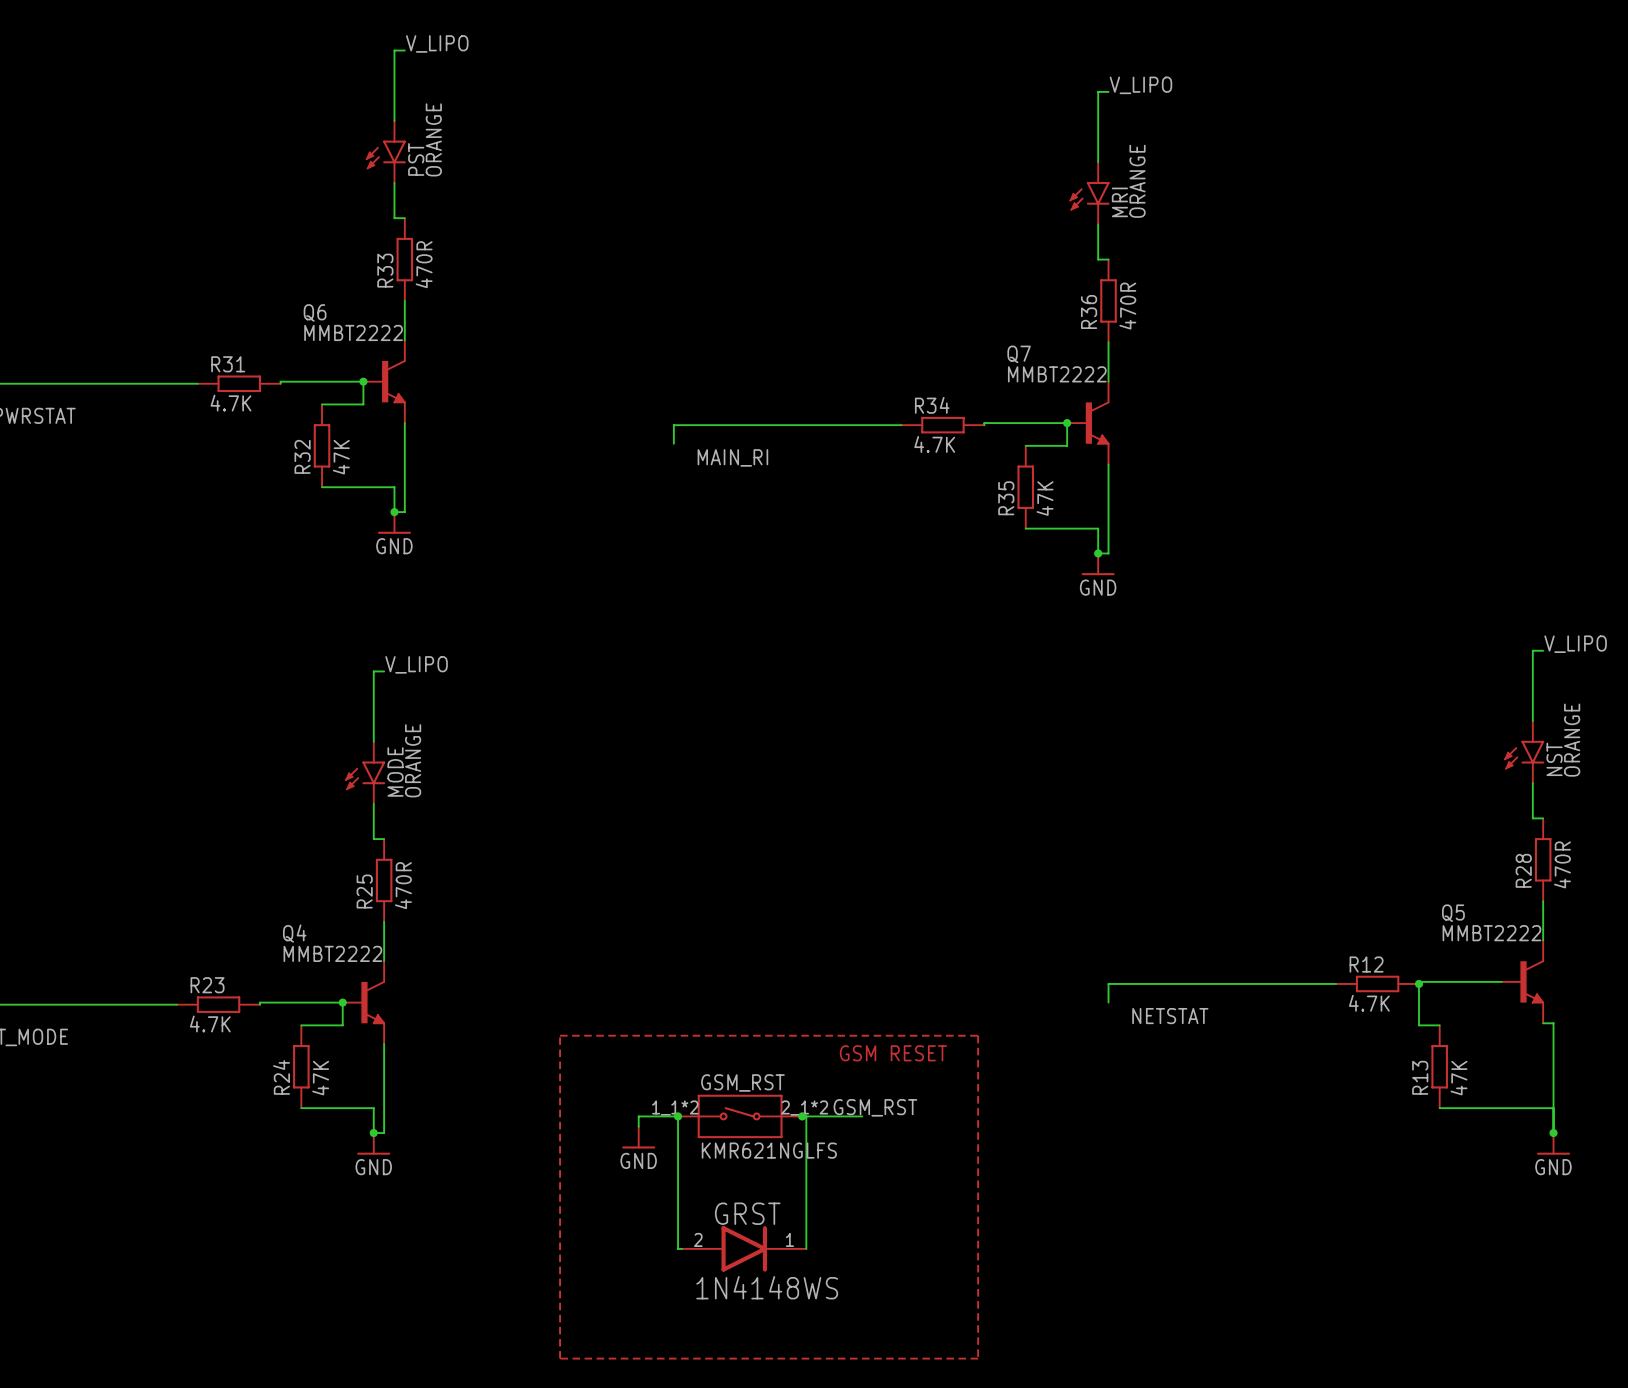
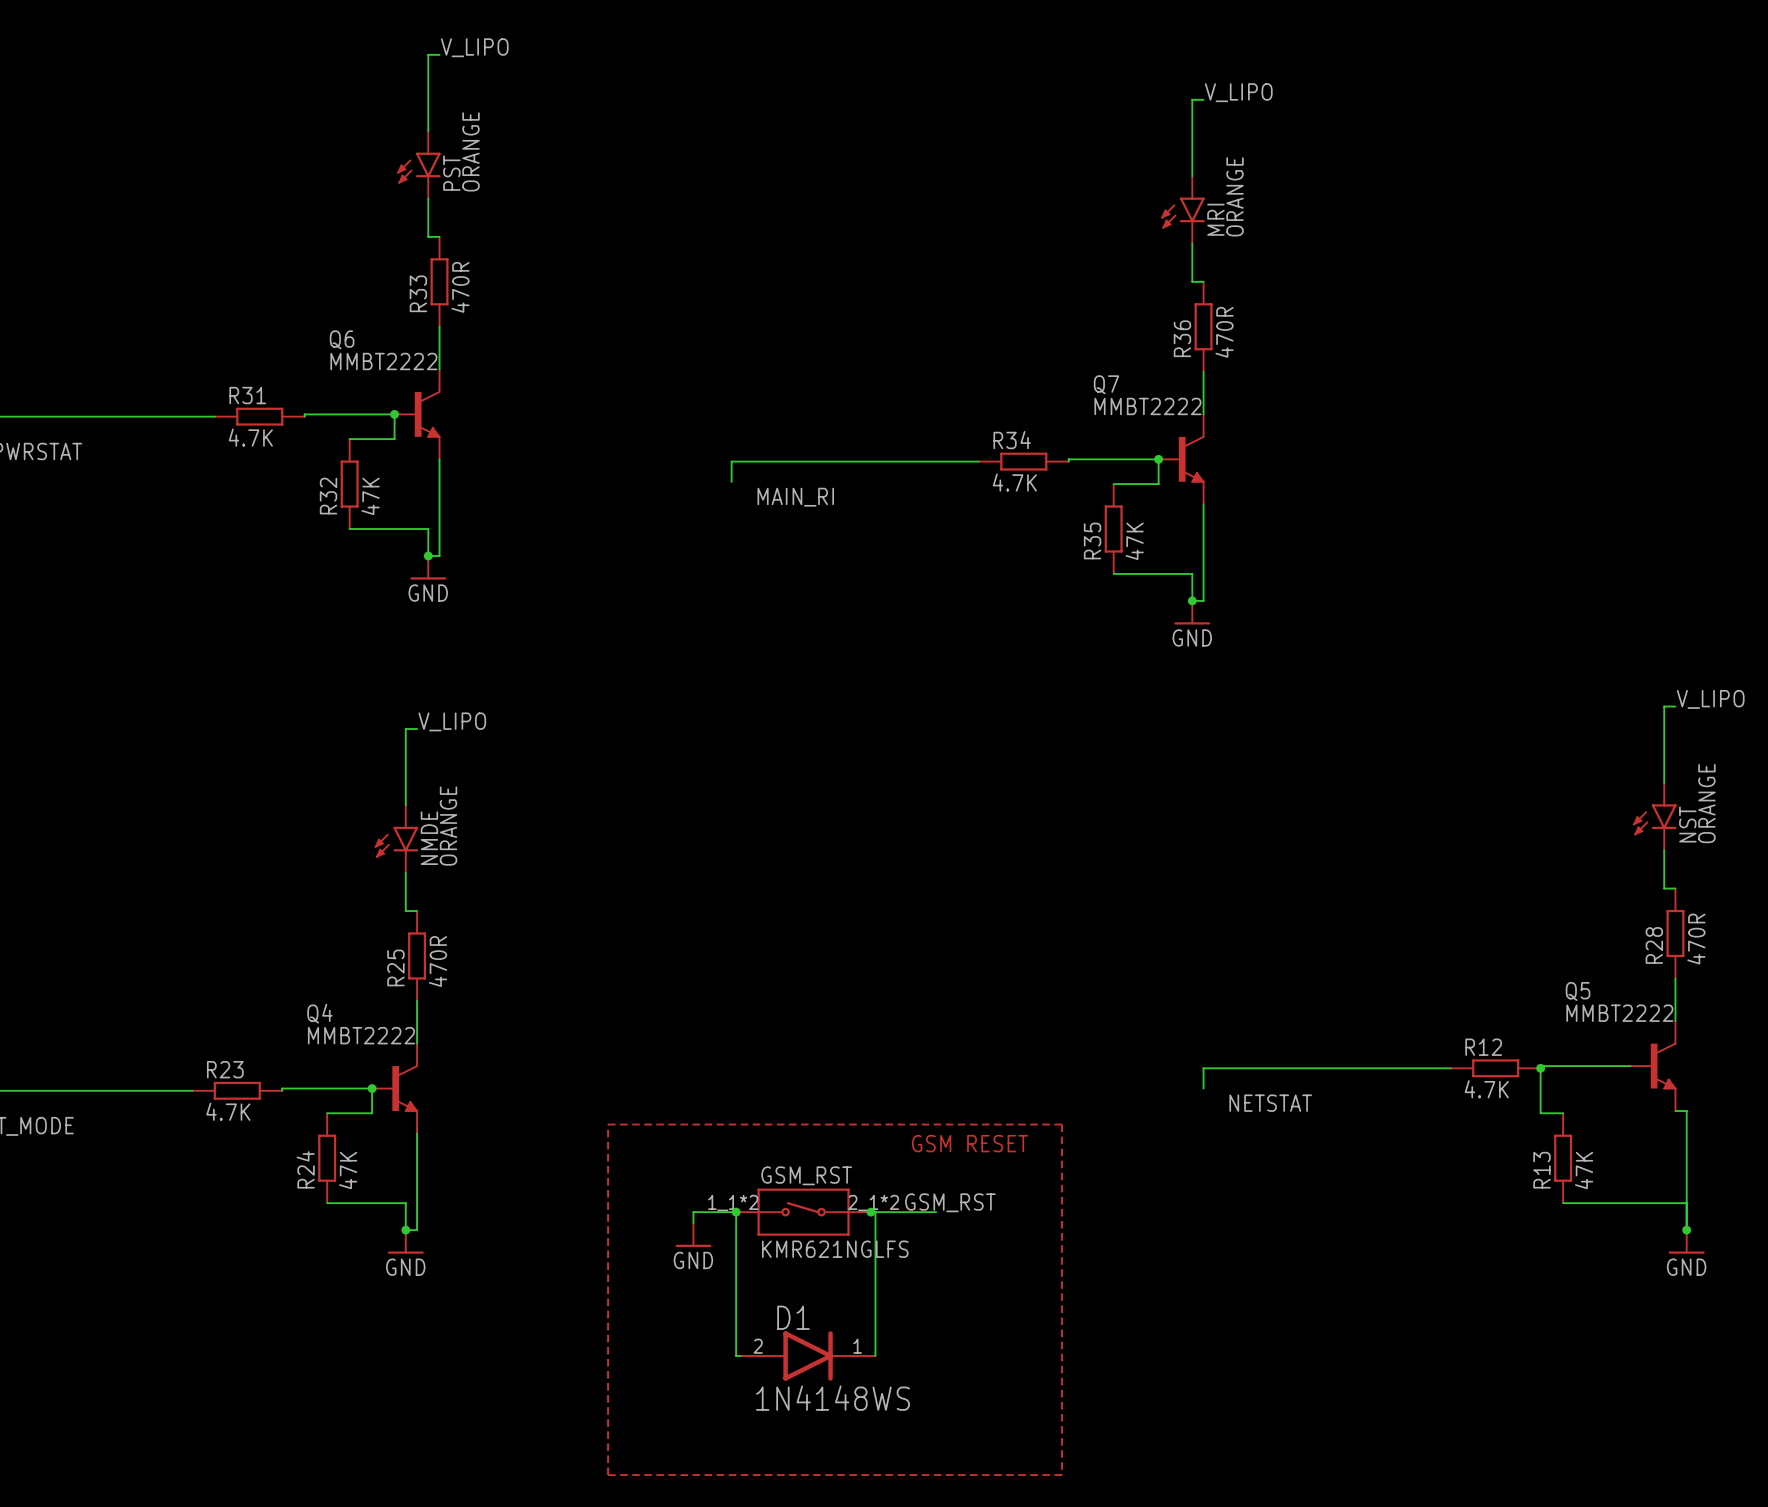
MODE name: MODE (395, 772) -> NMDE (429, 838)
GRST name: GRST (747, 1213) -> D1 (793, 1317)

